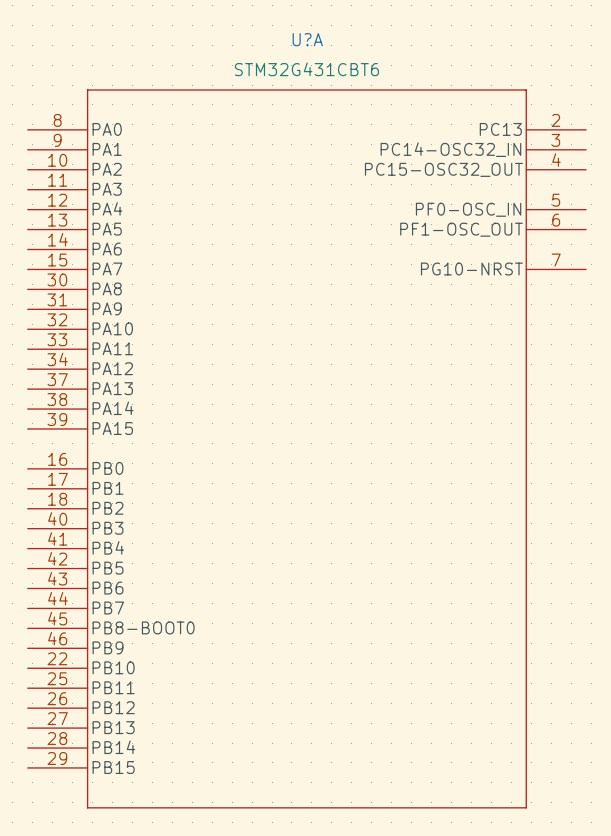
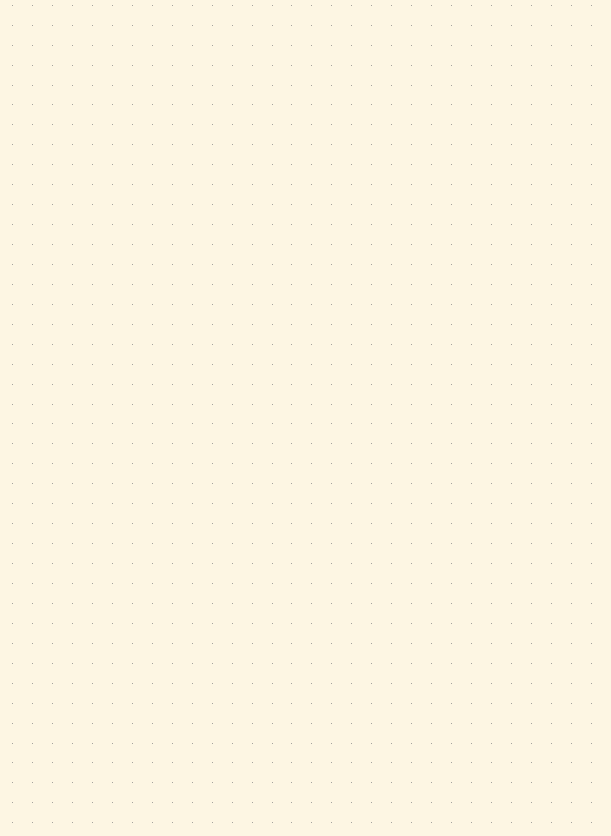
U?A: STM32G431CBT6 (306, 448) -> none

